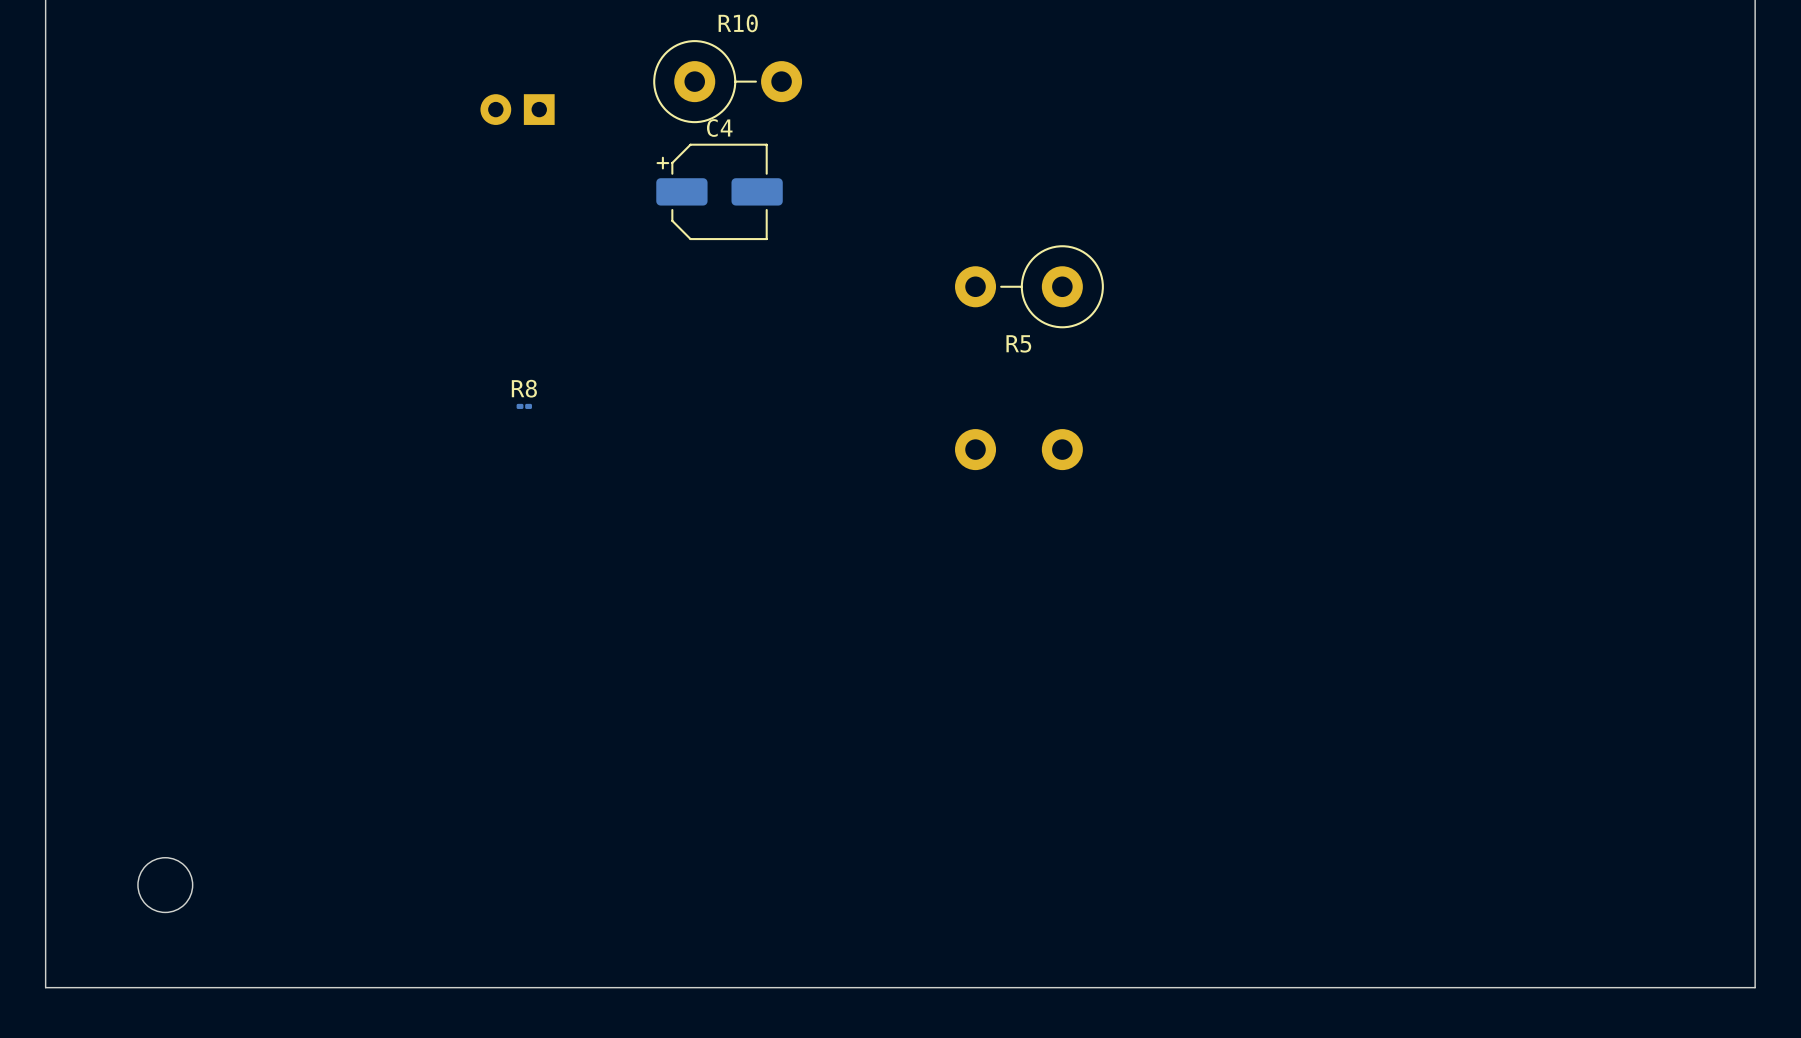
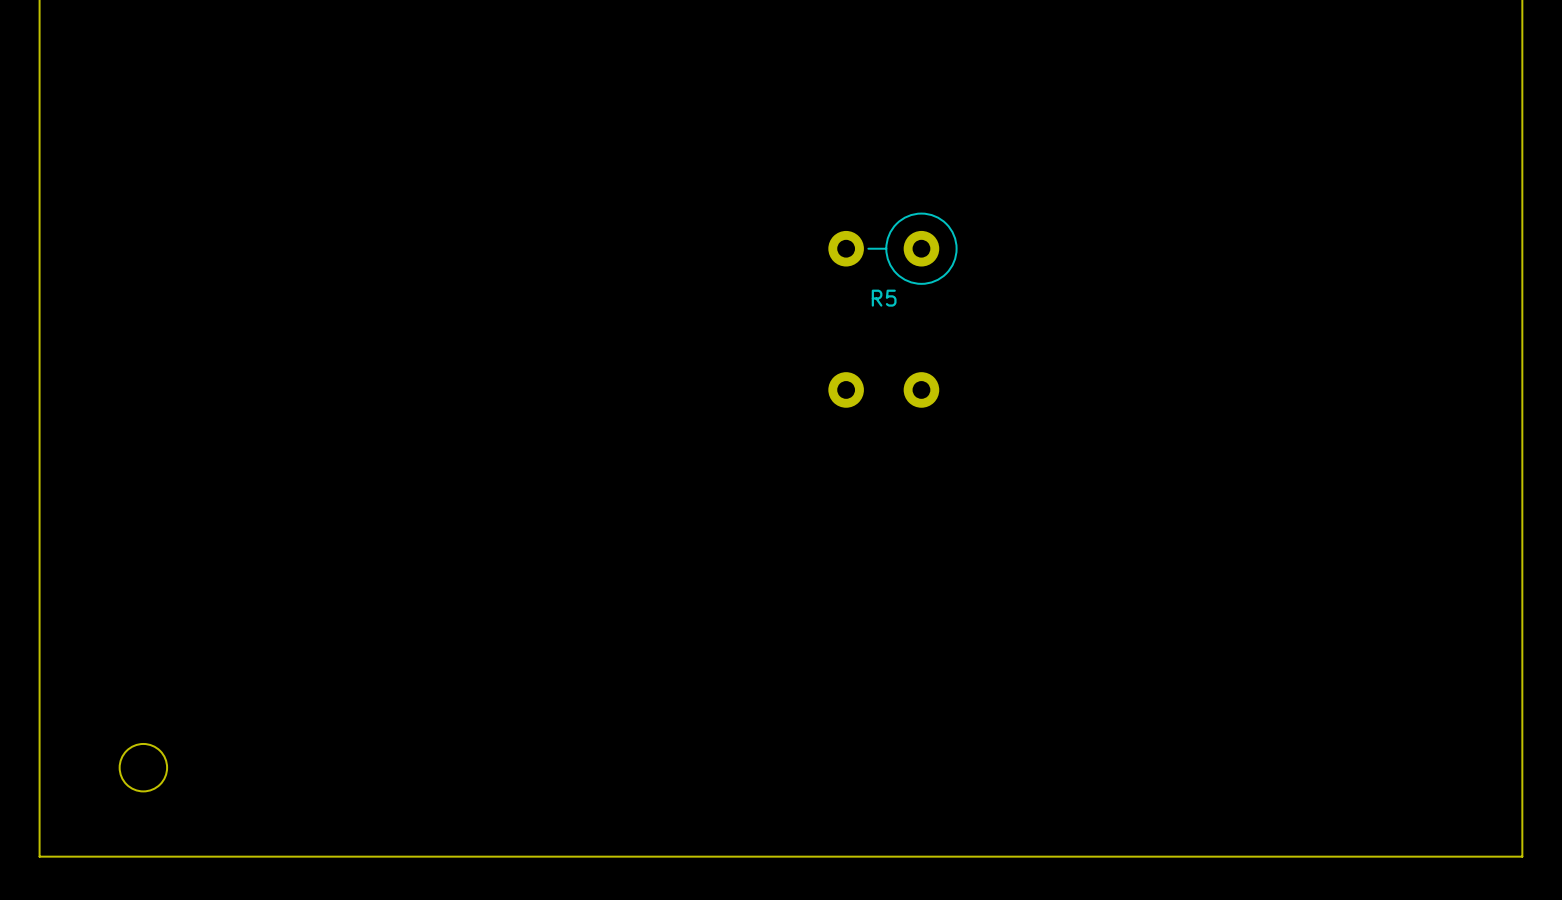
R10: (727, 81) -> none
part: (517, 109) -> none
C4: (719, 191) -> none
R8: (524, 406) -> none

